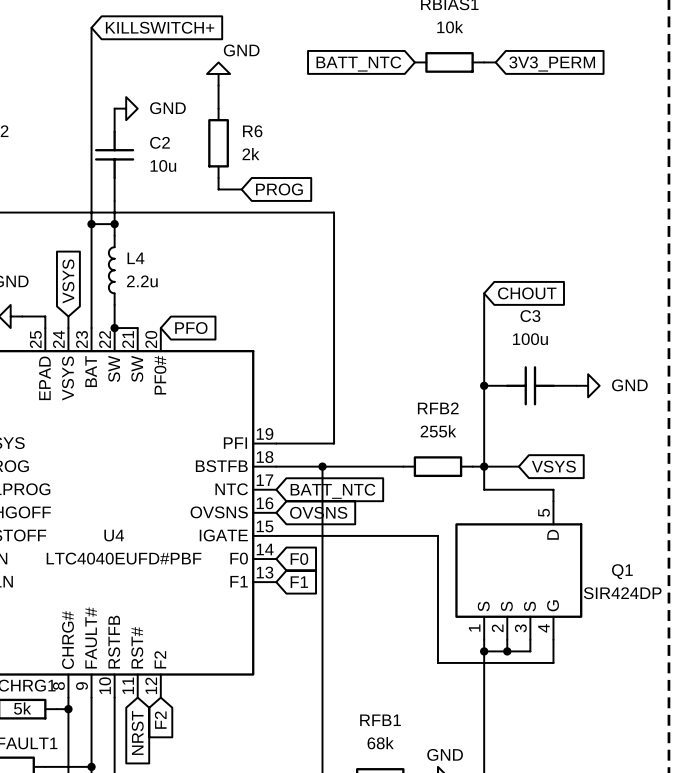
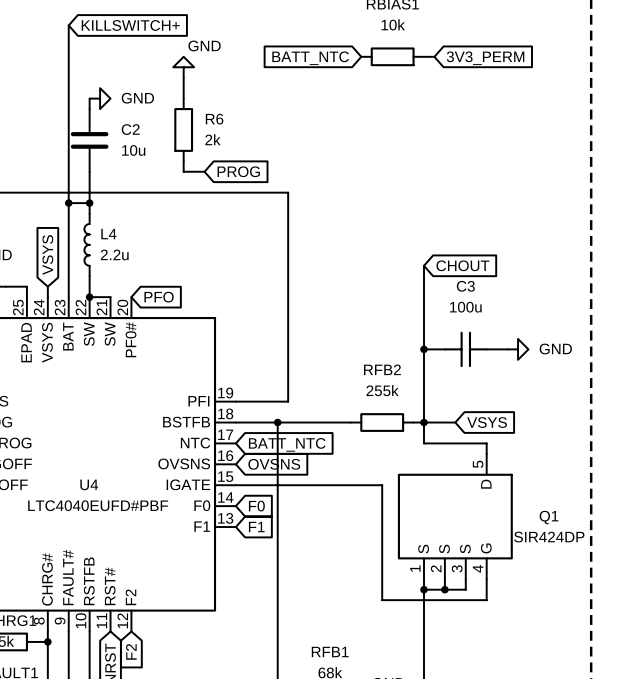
C2 symbol: [94, 108, 135, 202] -> [70, 109, 109, 172]

